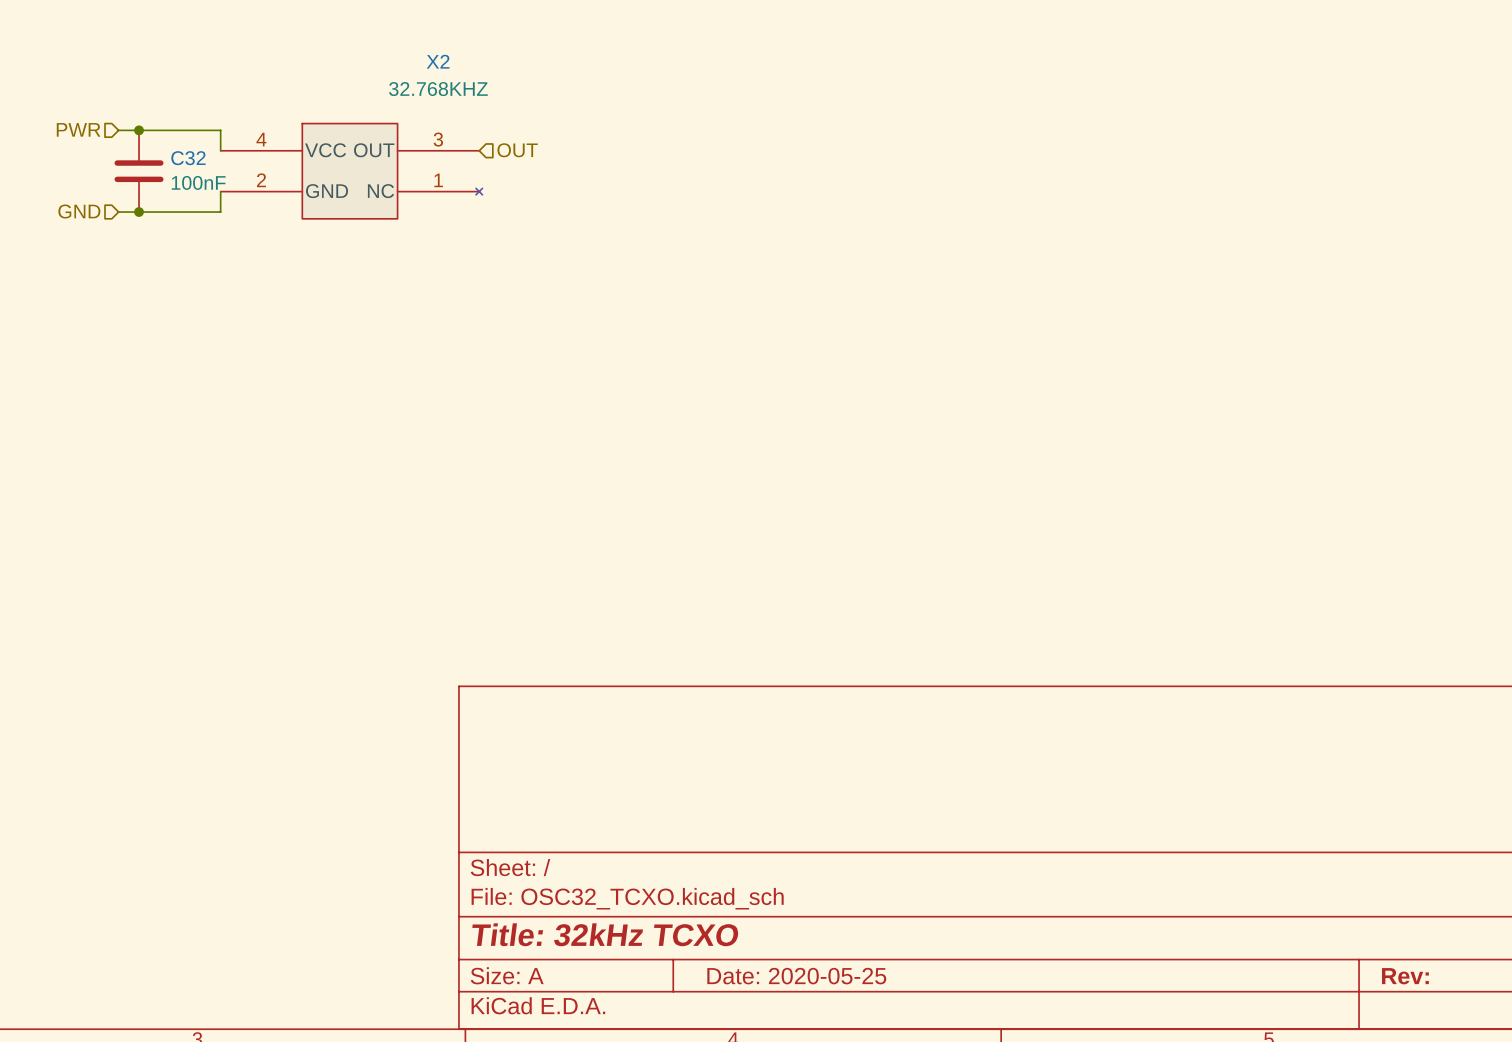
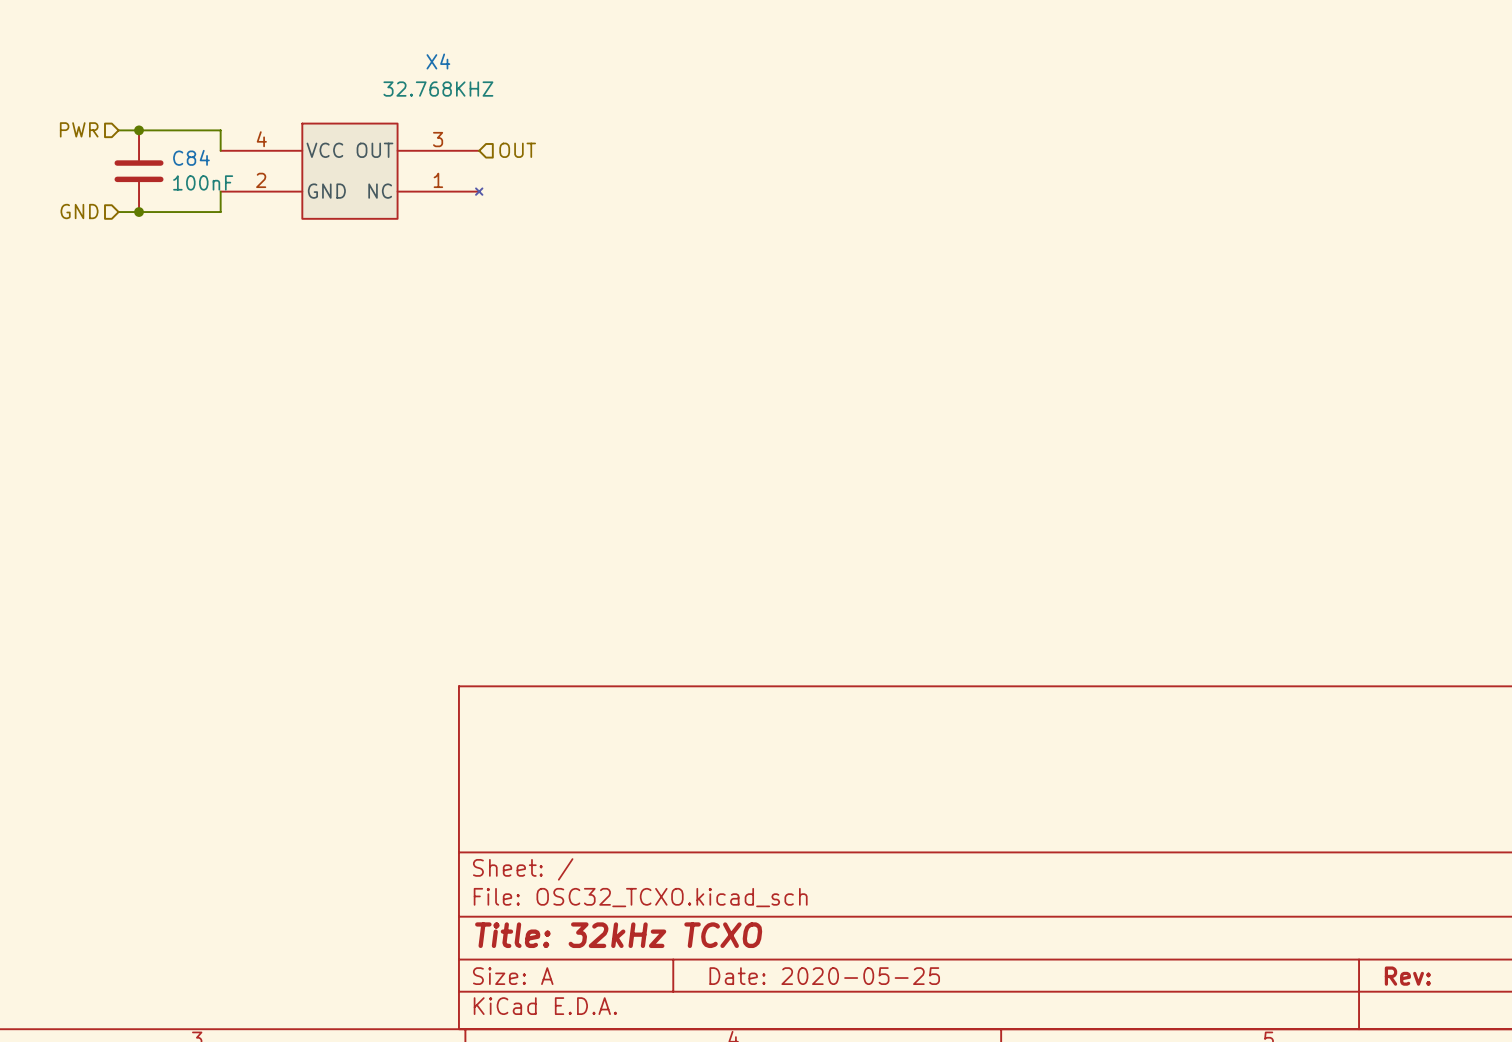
X2 name: X2 (438, 61) -> X4 (438, 61)
C32 name: C32 (188, 158) -> C84 (191, 157)

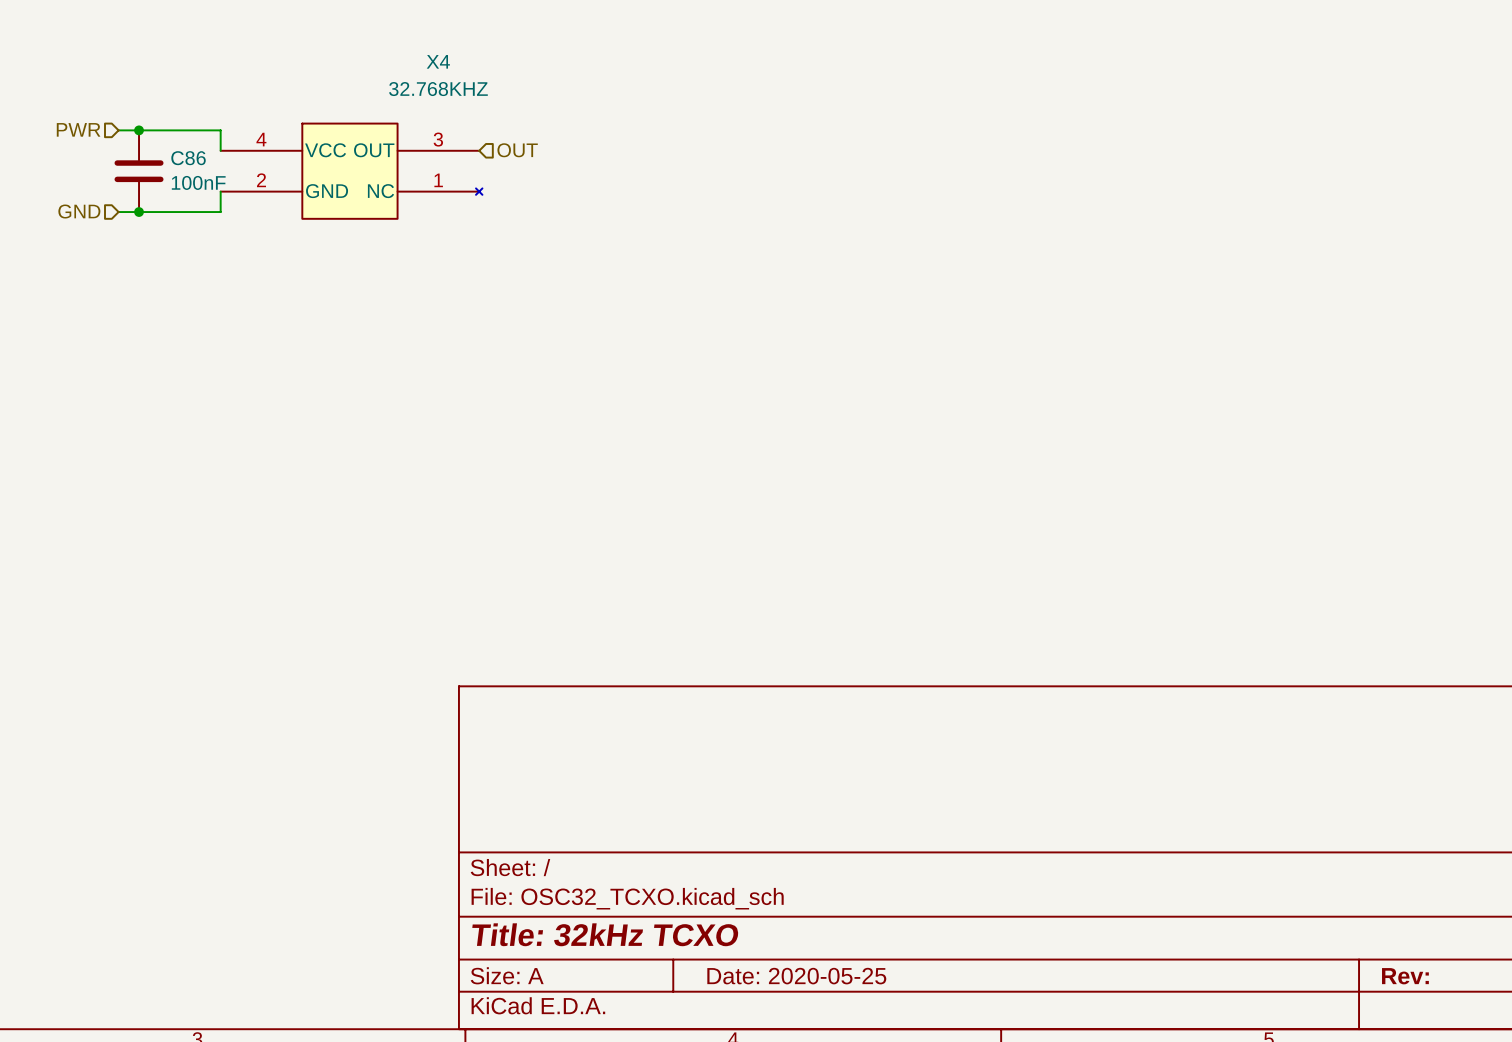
C84 name: C84 (191, 157) -> C86 (188, 158)

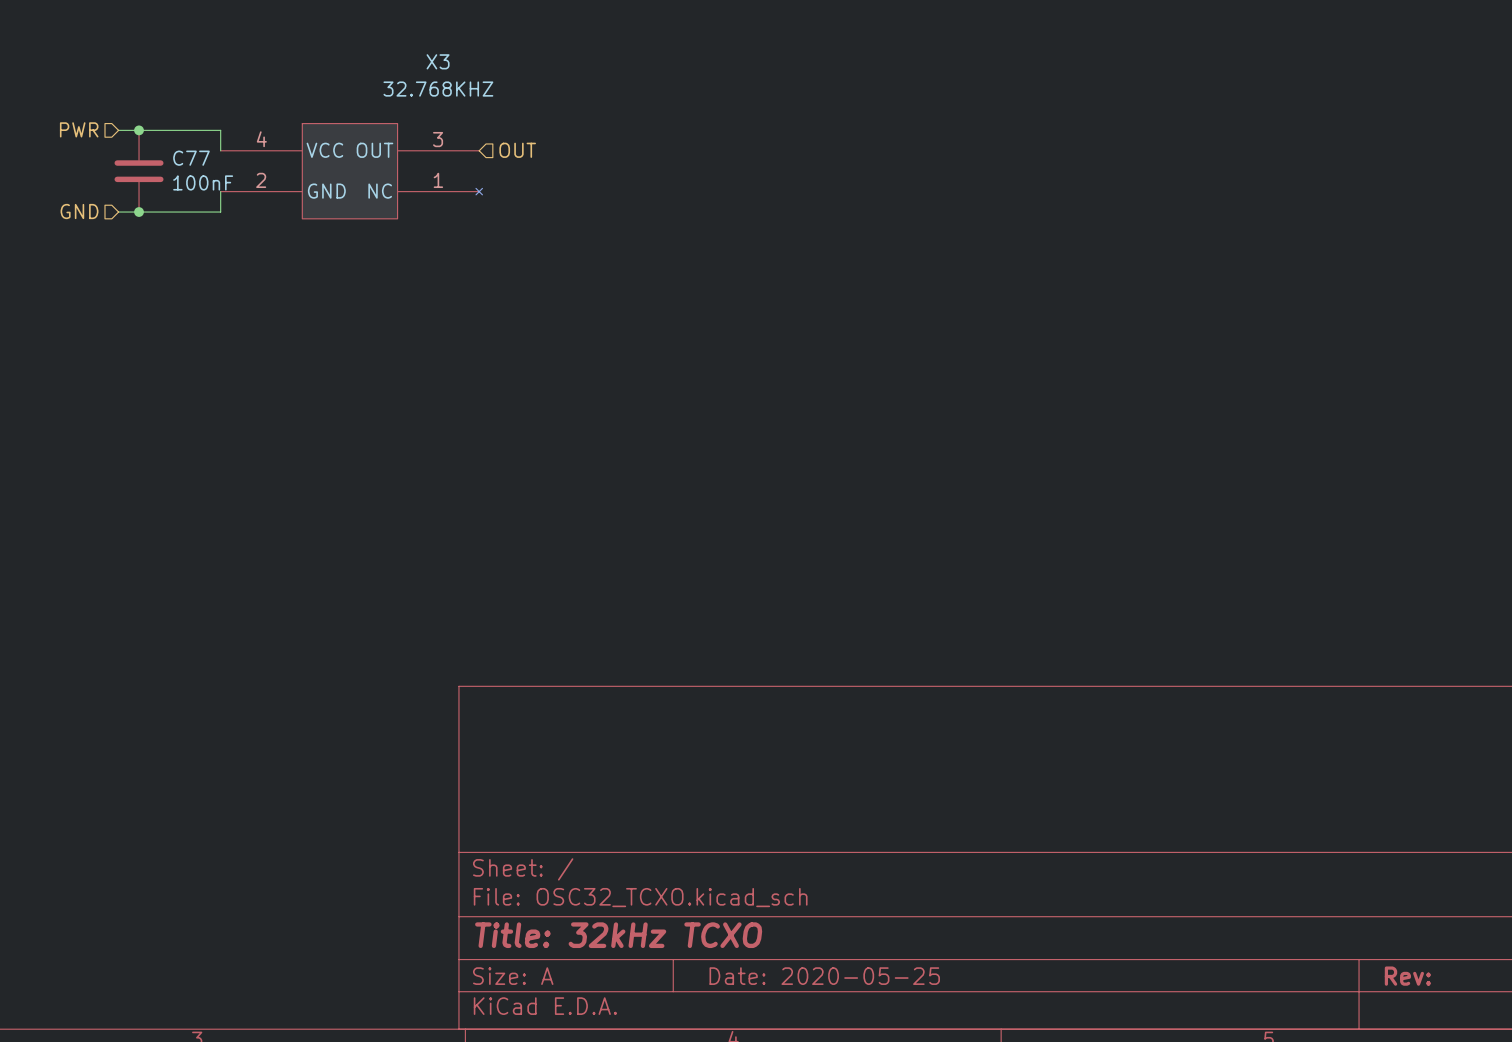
X4 name: X4 (438, 61) -> X3 (438, 61)
C86 name: C86 (188, 158) -> C77 (191, 158)

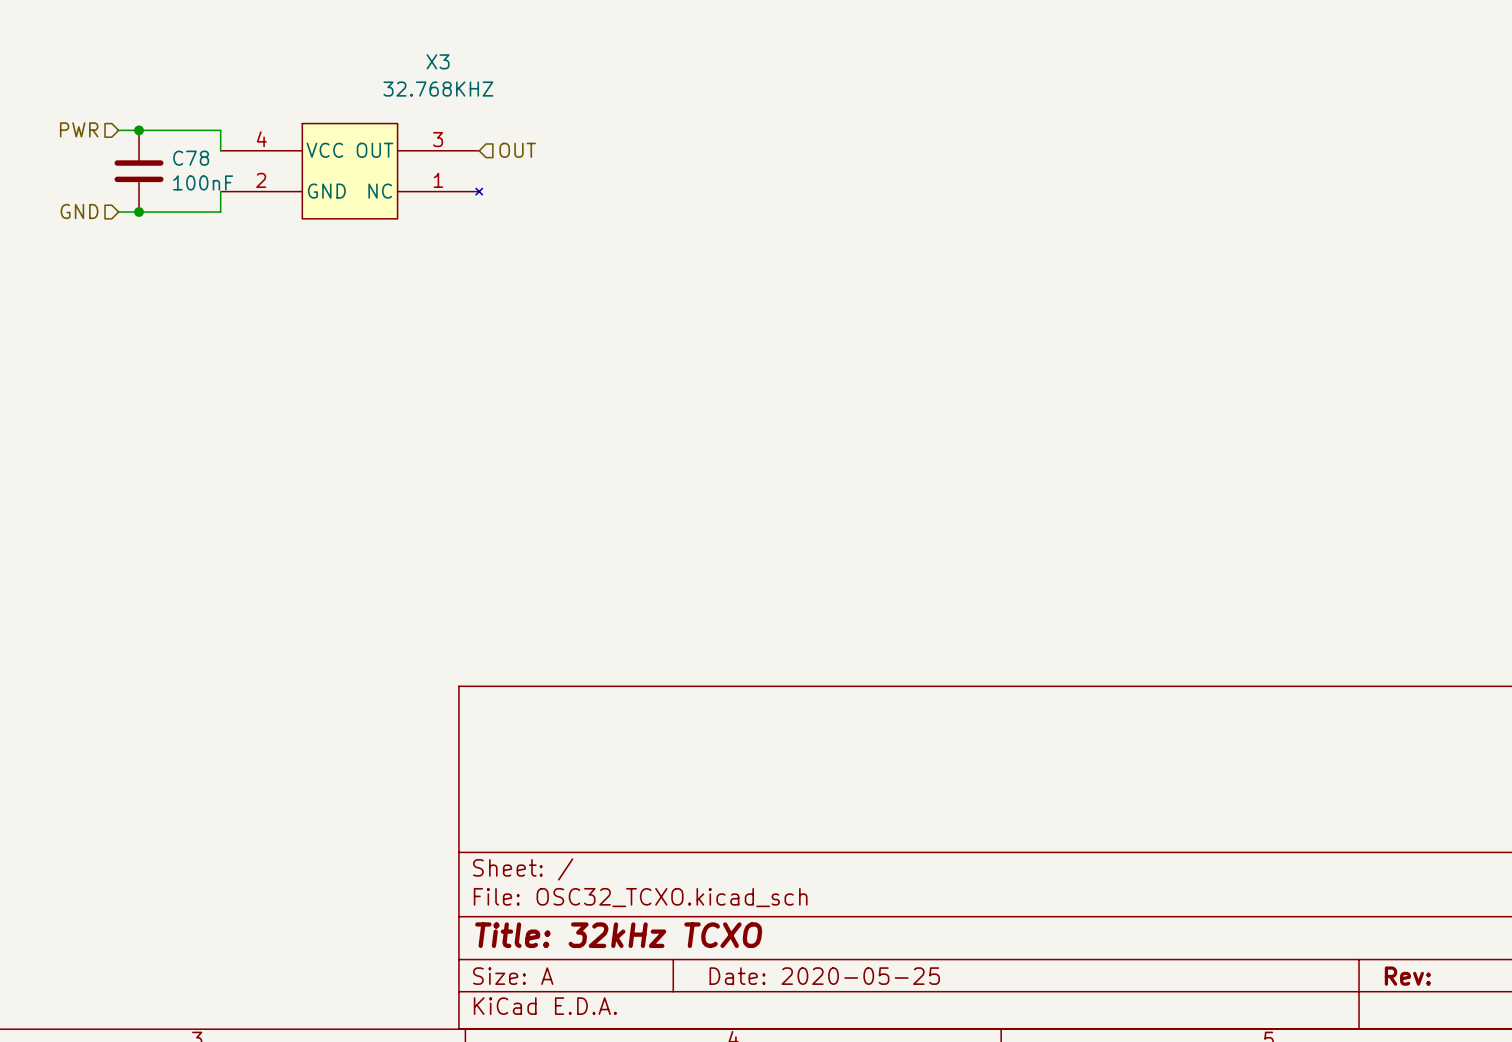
C77 name: C77 (191, 158) -> C78 (191, 158)

